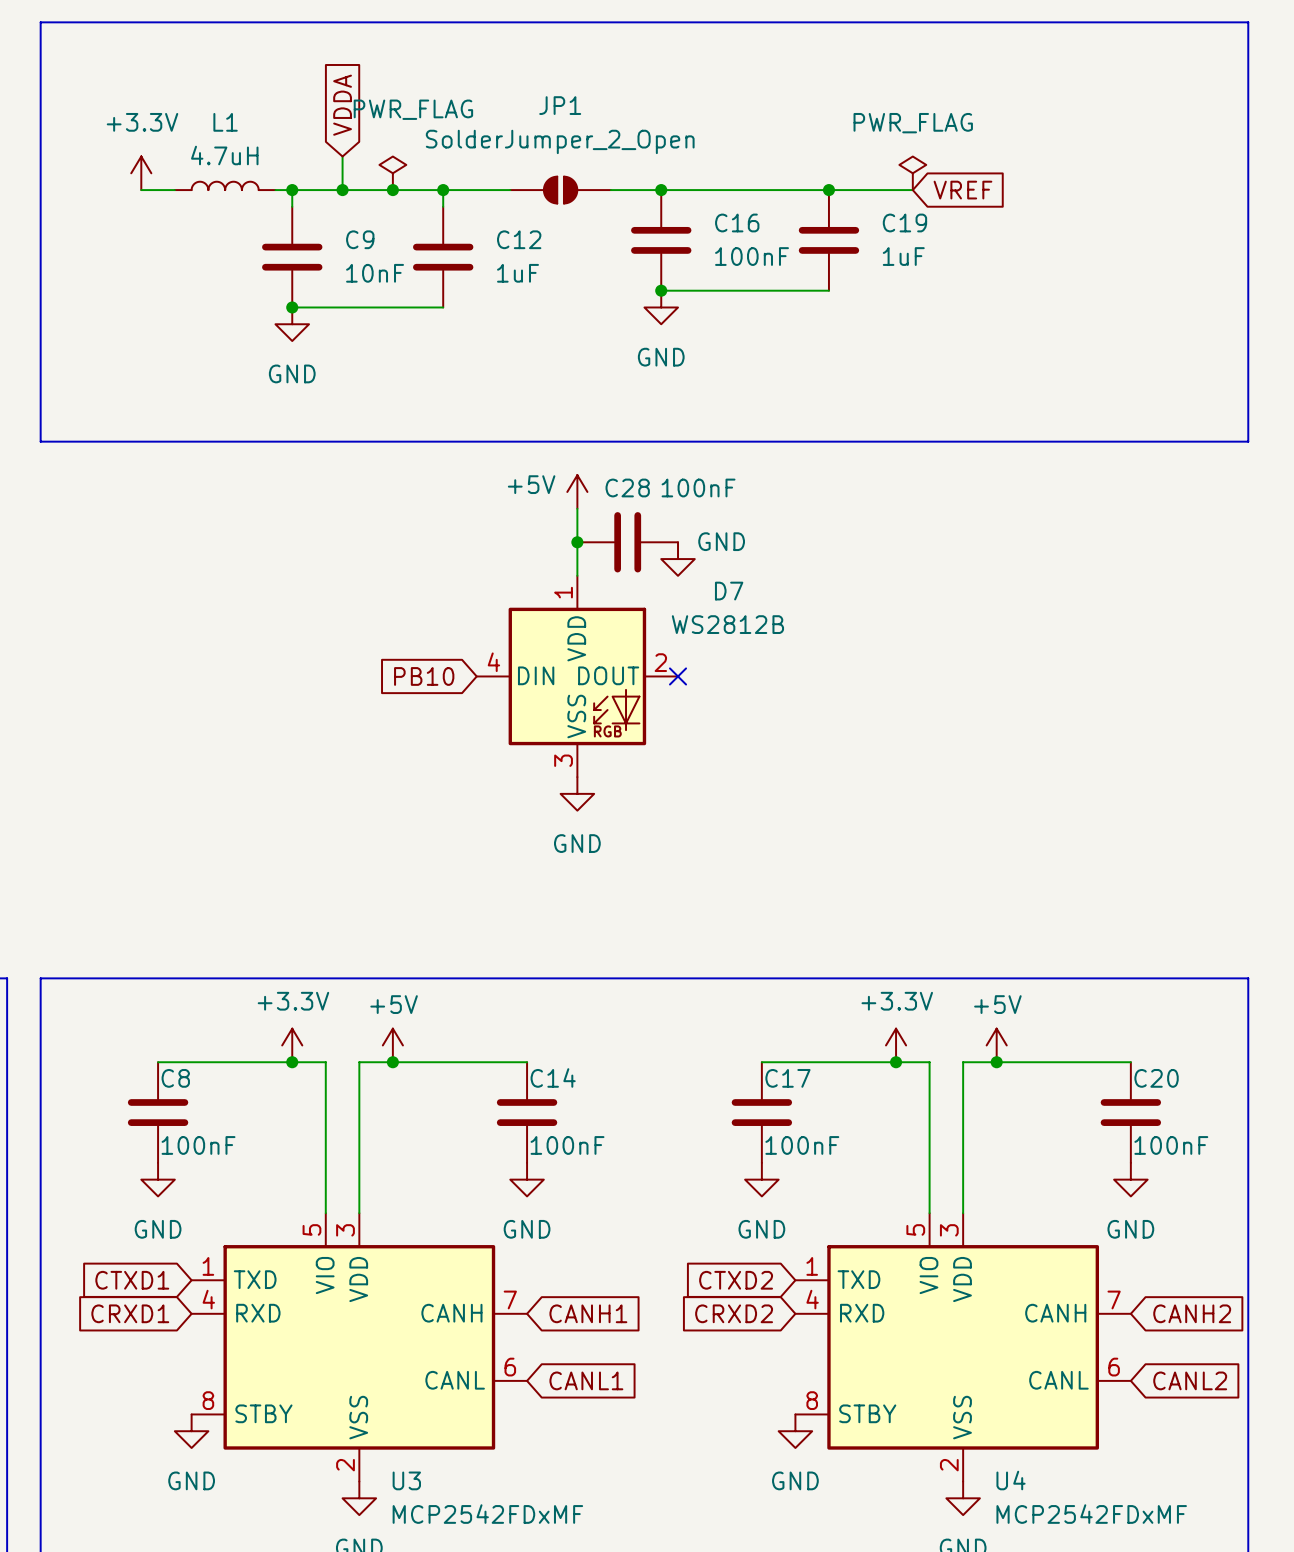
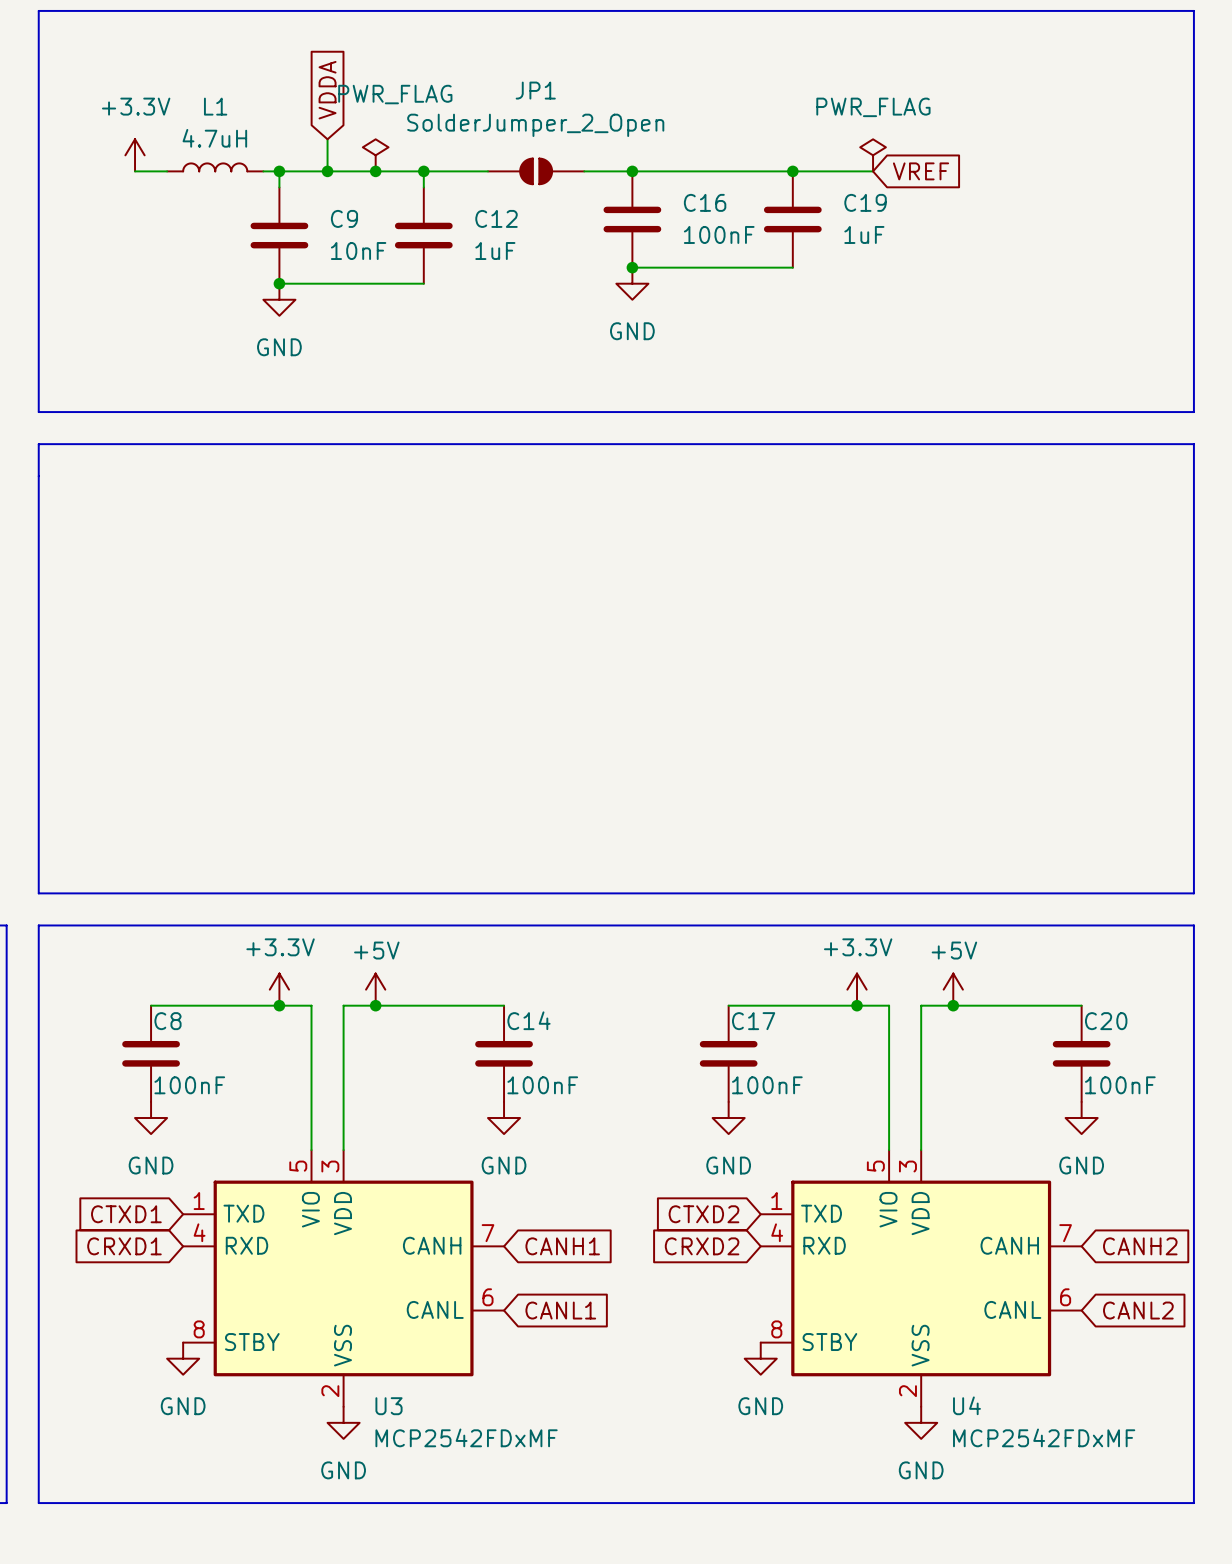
line: none -> (38, 444) (38, 893) (1193, 893) (1193, 444) (38, 444)
power symbol: +5V (577, 491) -> none
wire: (577, 508) (577, 575) -> none
junction: (577, 542) -> none
C28: 100nF (627, 542) -> none
power symbol: GND (678, 559) -> none
global label: PB10 (424, 676) -> none
D7: WS2812B (577, 676) -> none
no-connect mark: (678, 676) -> none
power symbol: GND (577, 793) -> none

